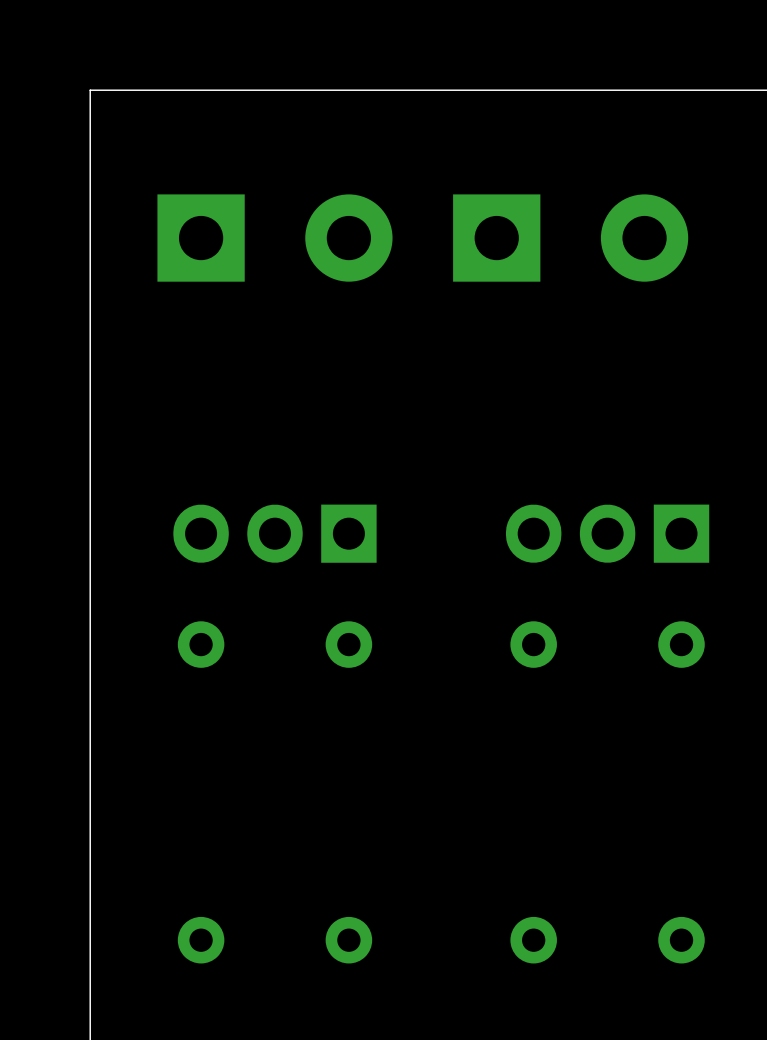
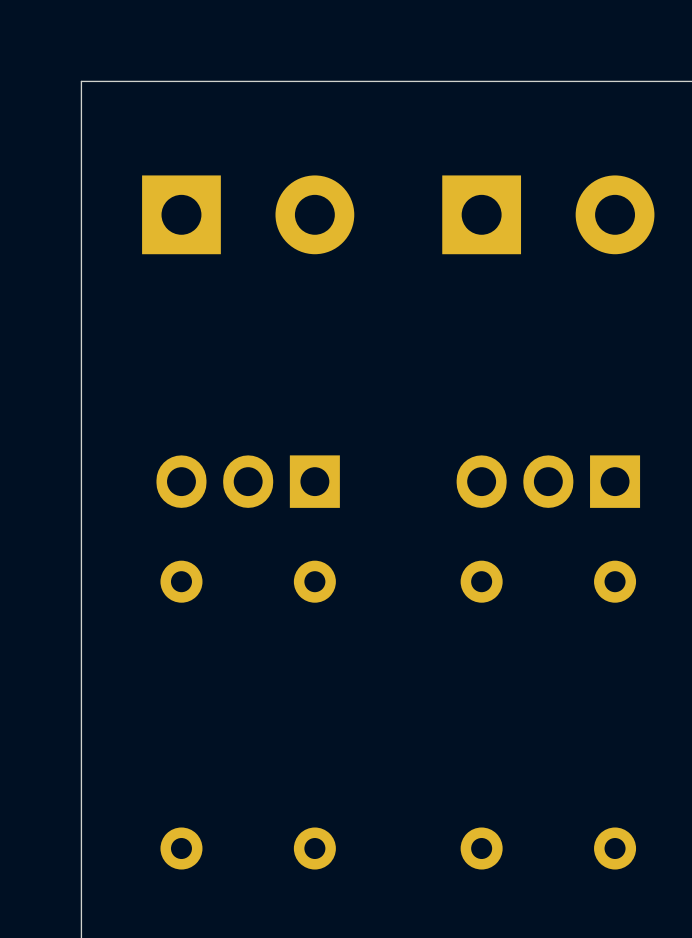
part position: (570, 238) -> (548, 214)

